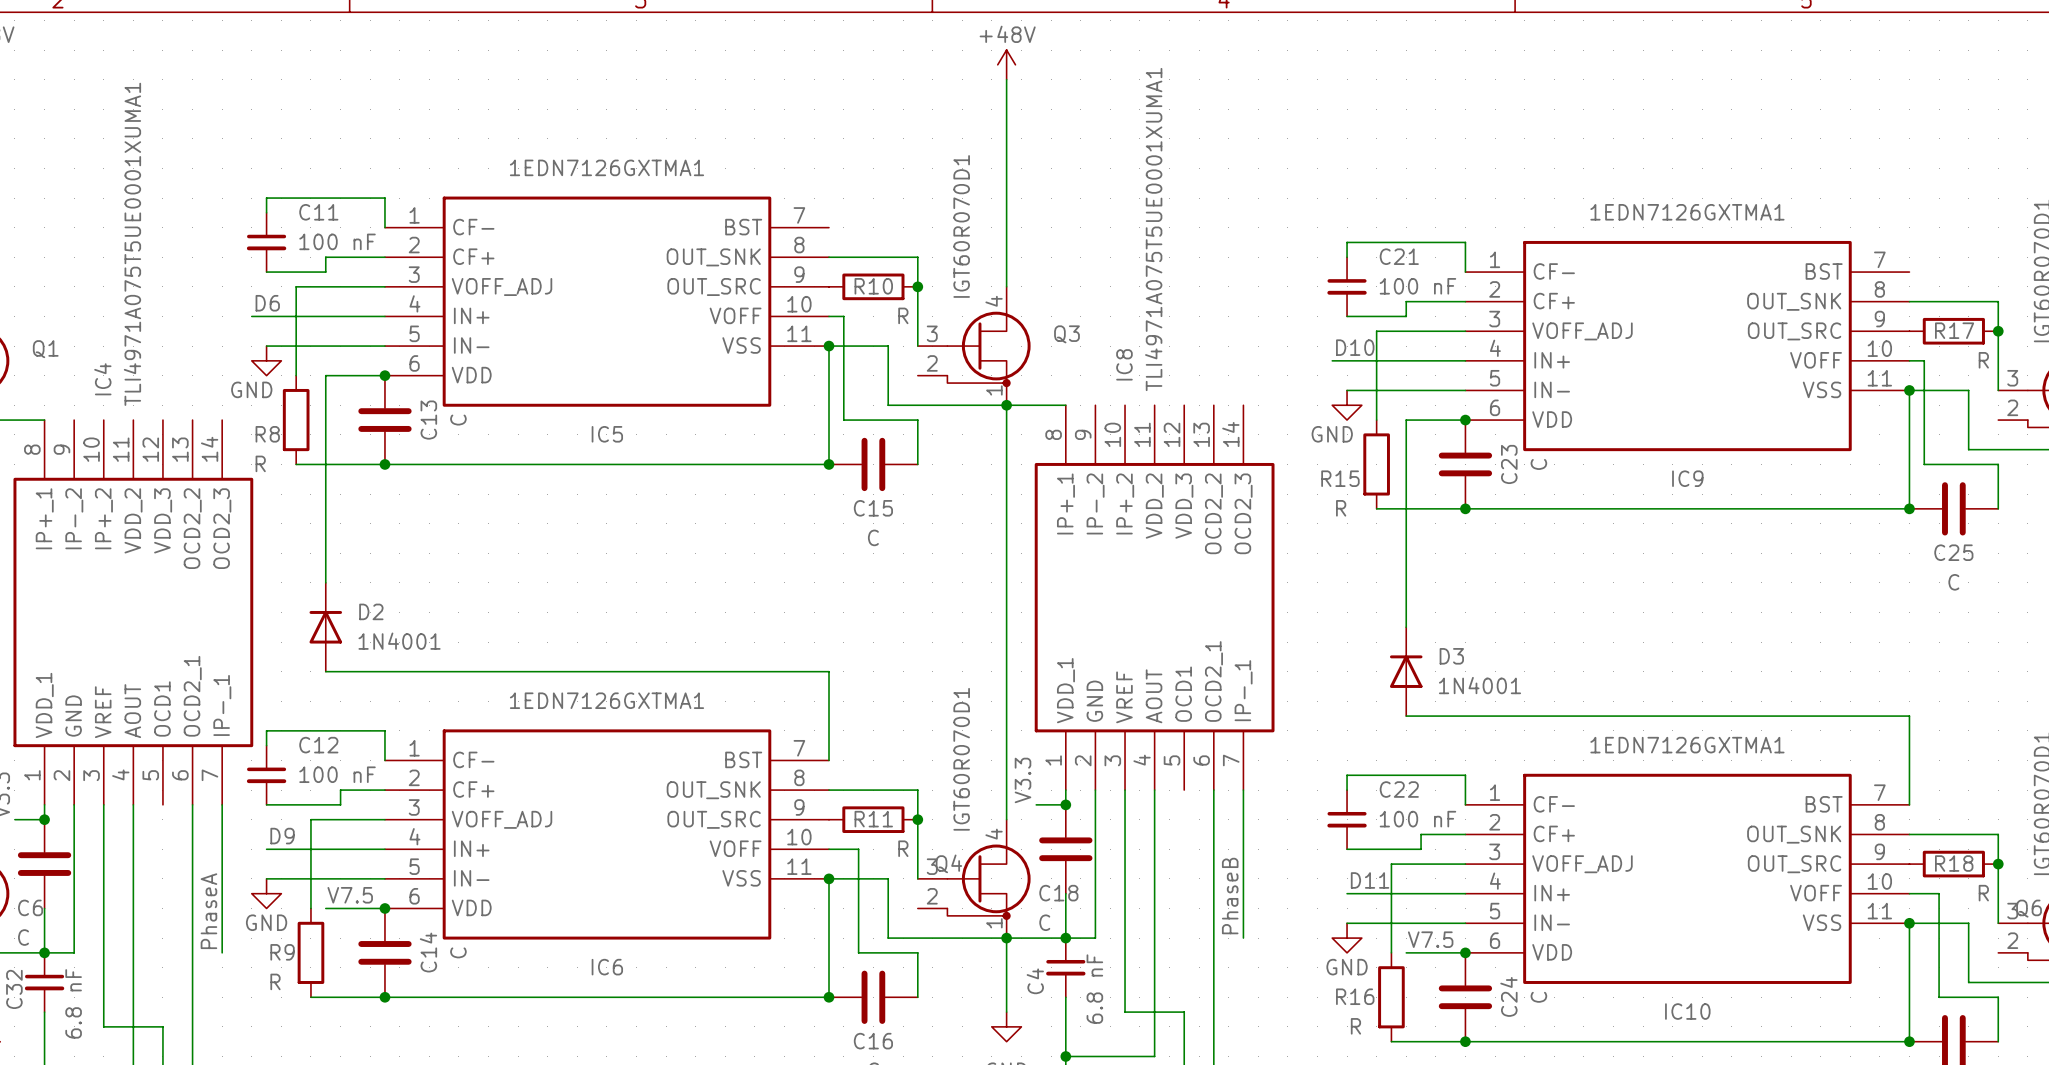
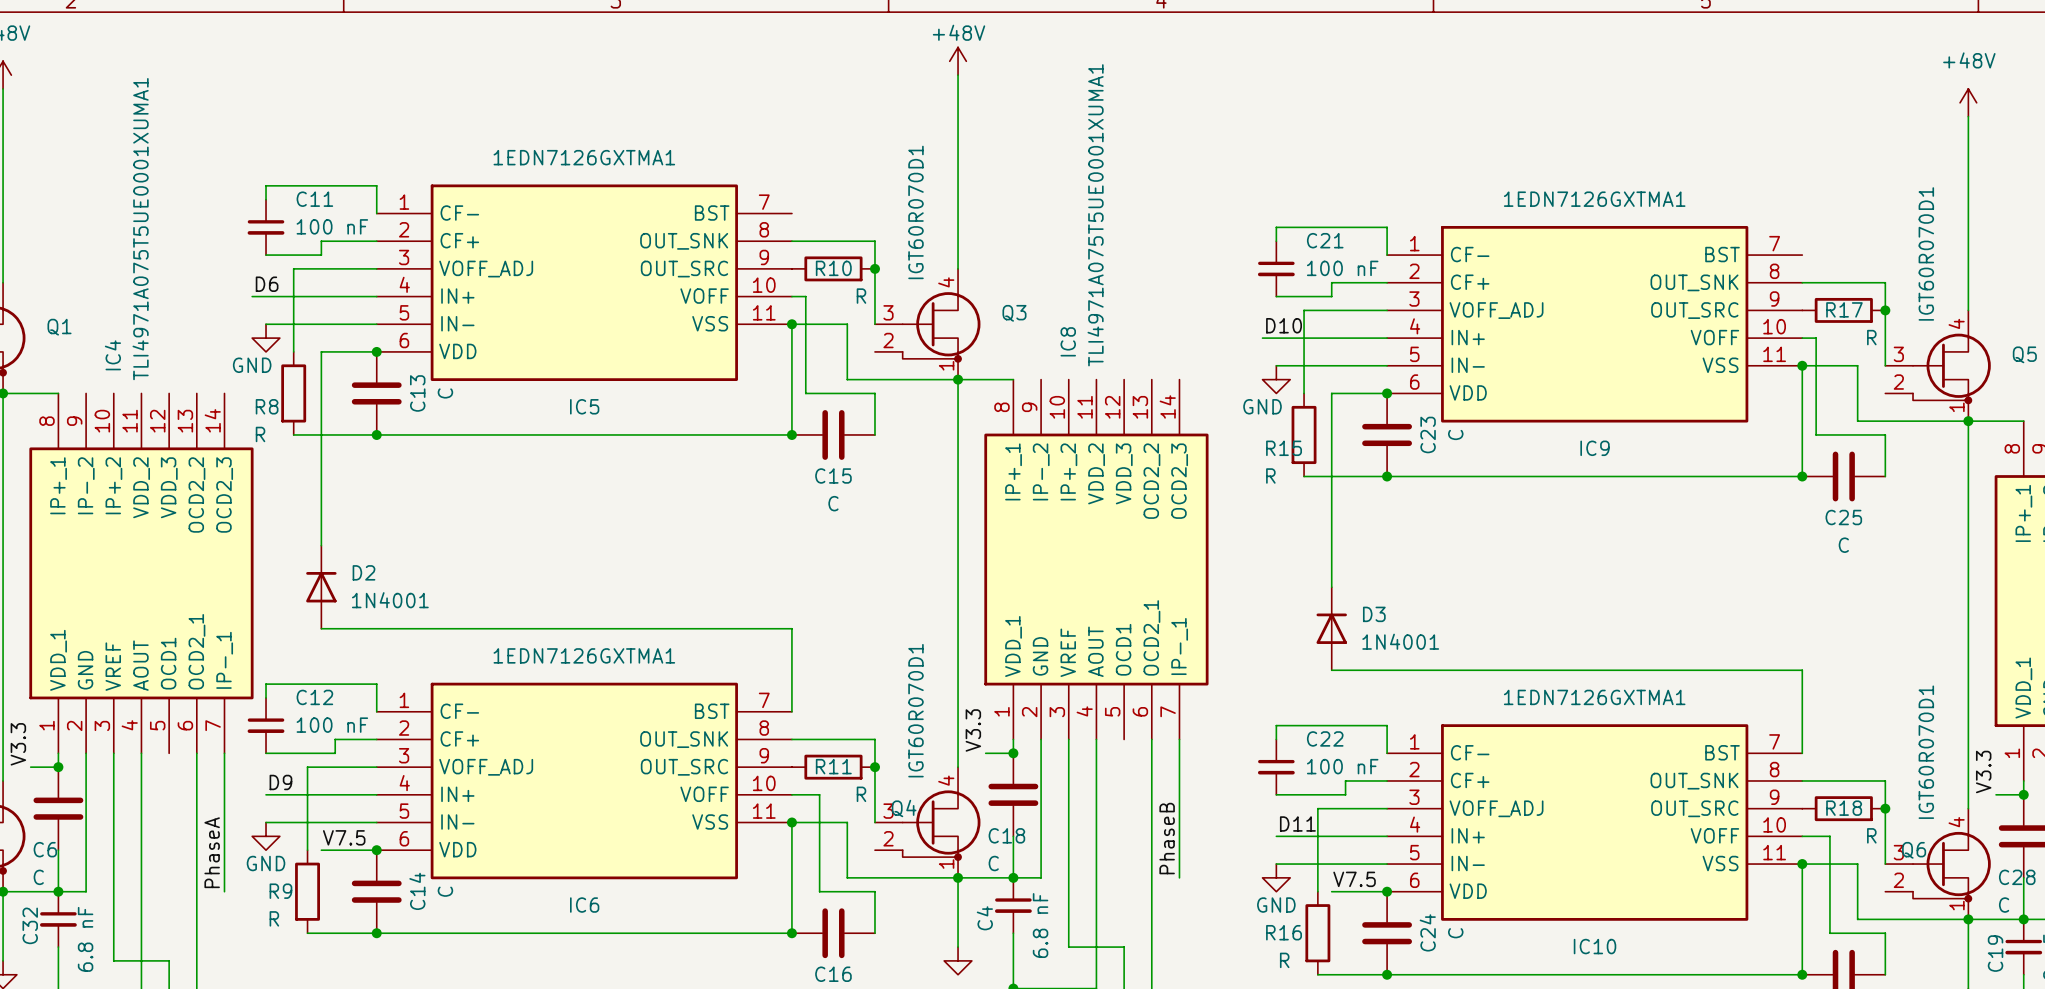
R15 name position: R15 (1340, 478) -> R15 (1284, 448)

